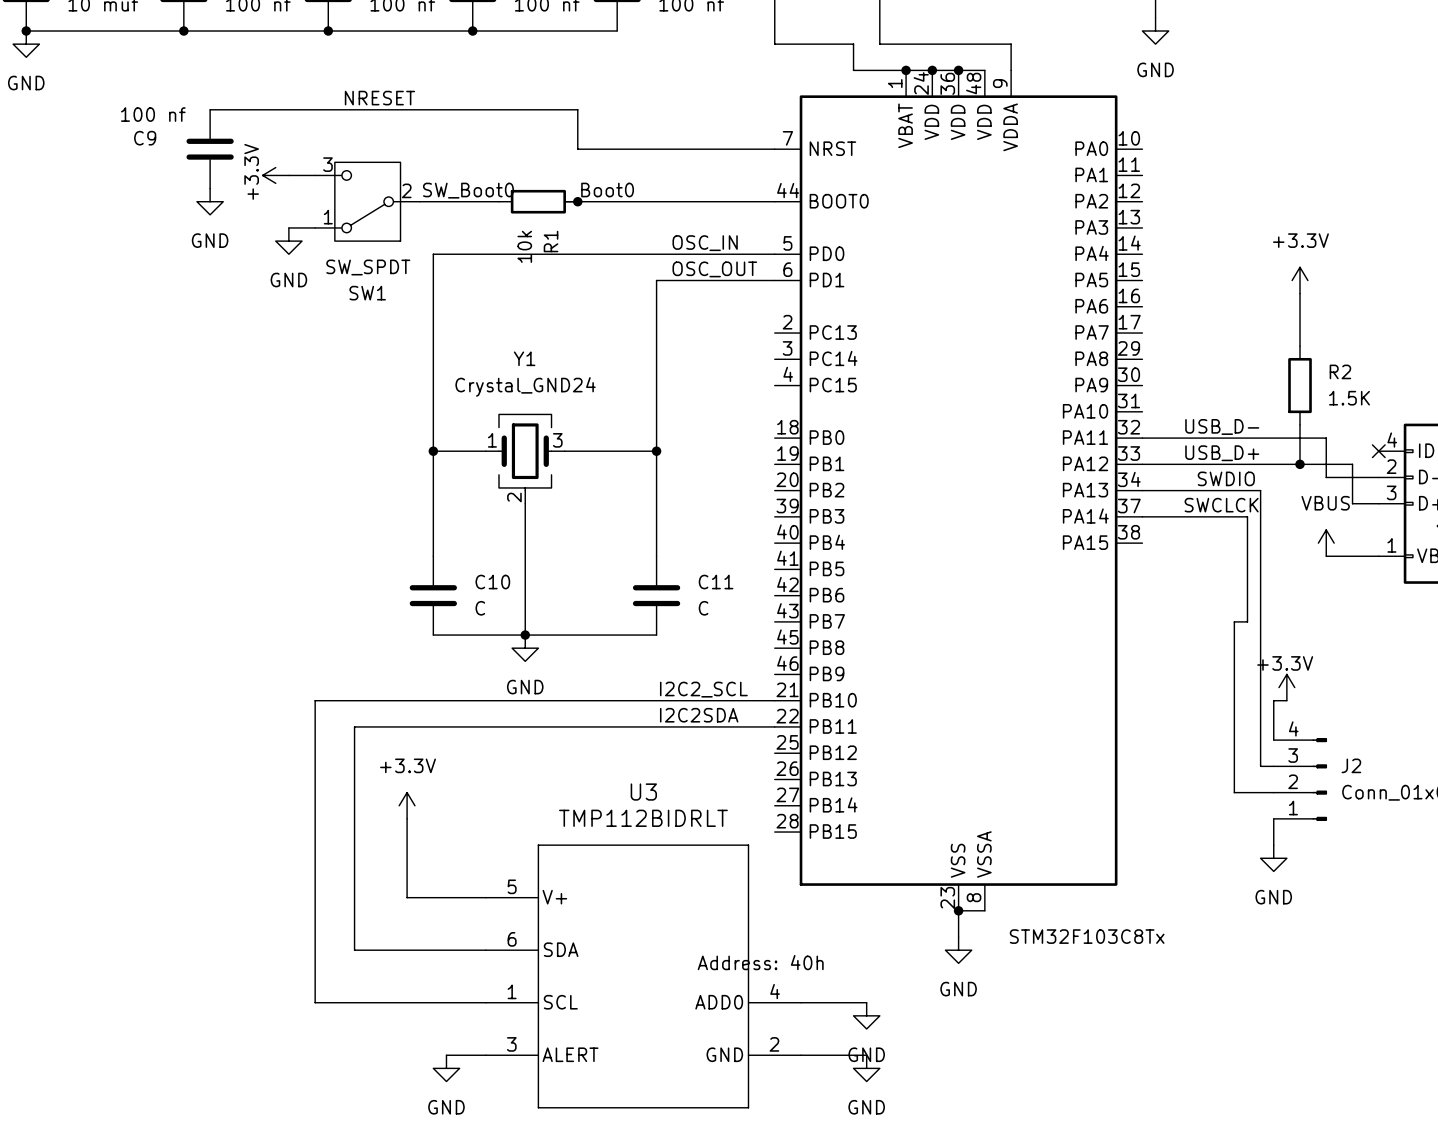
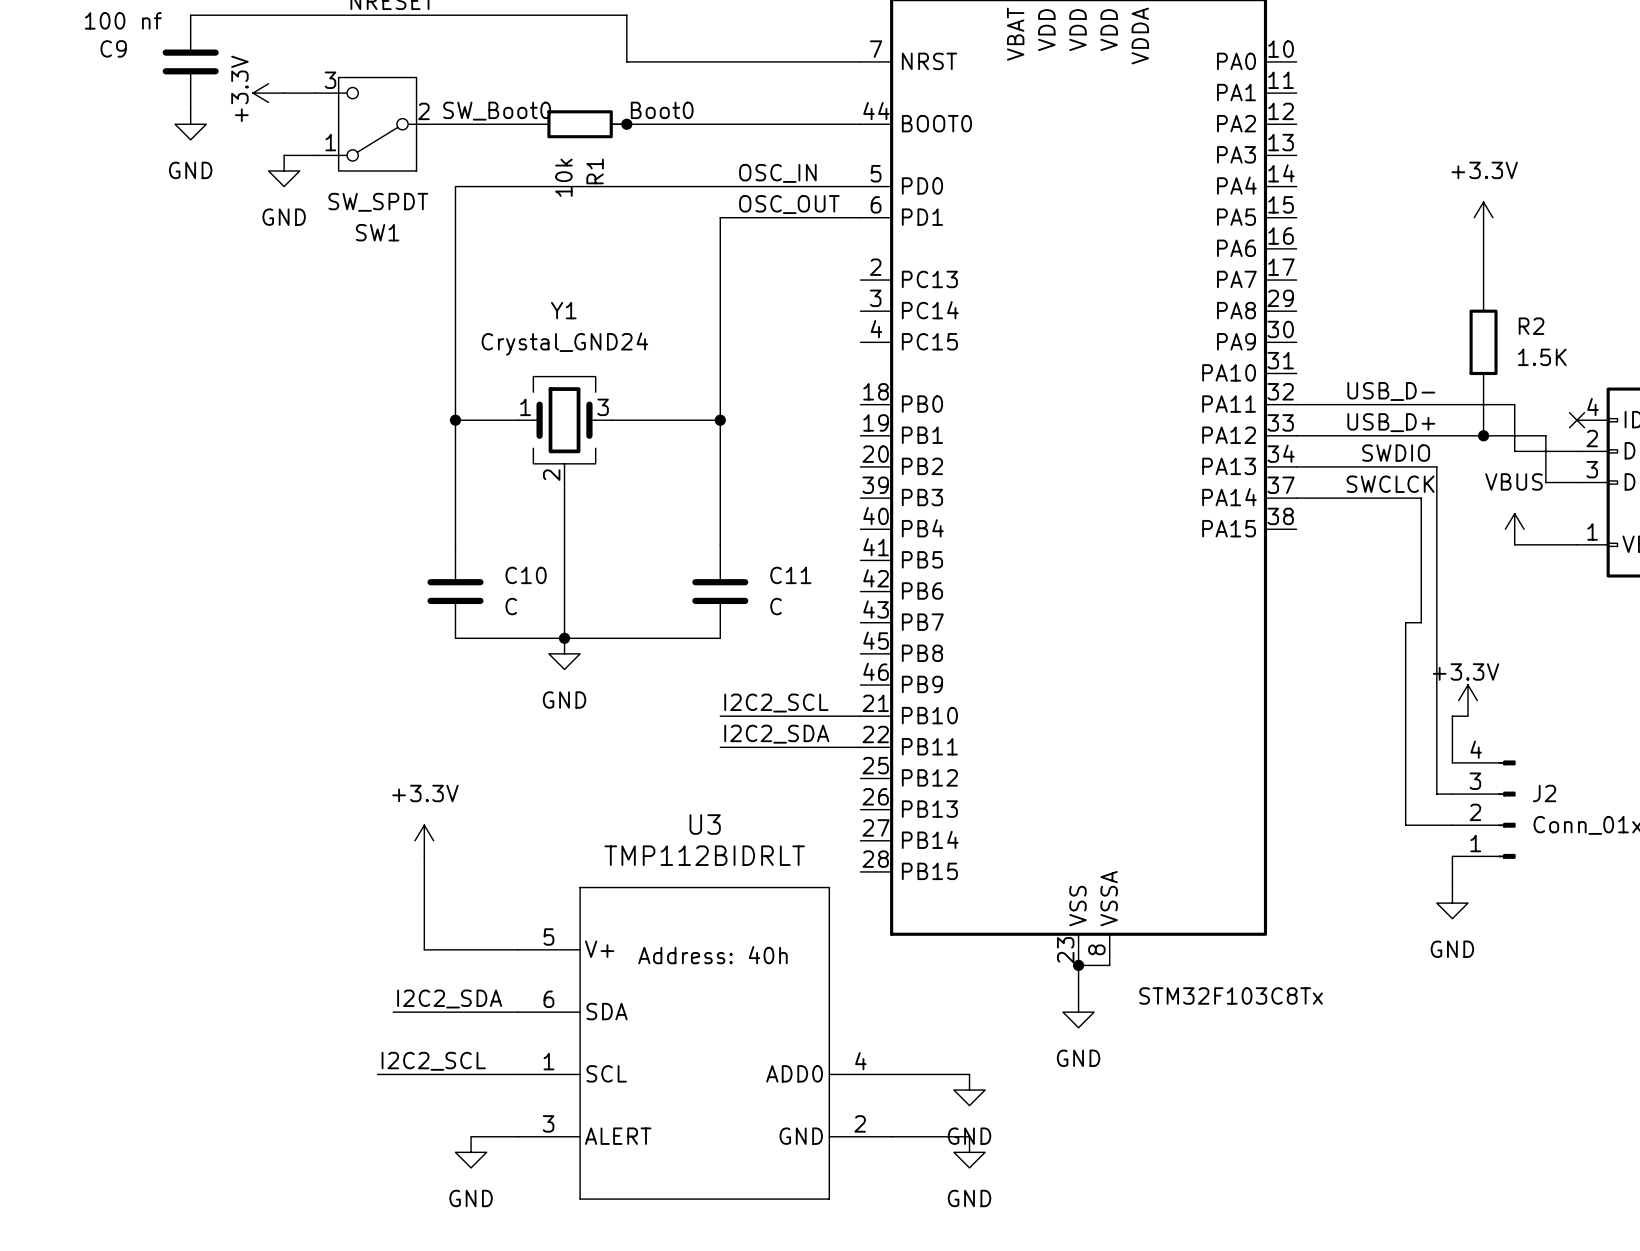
wire: (656, 700) (315, 700) (315, 1002) (367, 1002) -> none
label: I2C2SDA (699, 715) -> I2C2_SDA (776, 734)
wire: (656, 726) (354, 726) (354, 950) (380, 950) -> none
label: none -> I2C2_SDA (449, 998)
text position: Address: 40h (760, 962) -> Address: 40h (712, 955)
label: none -> I2C2_SCL (433, 1061)

